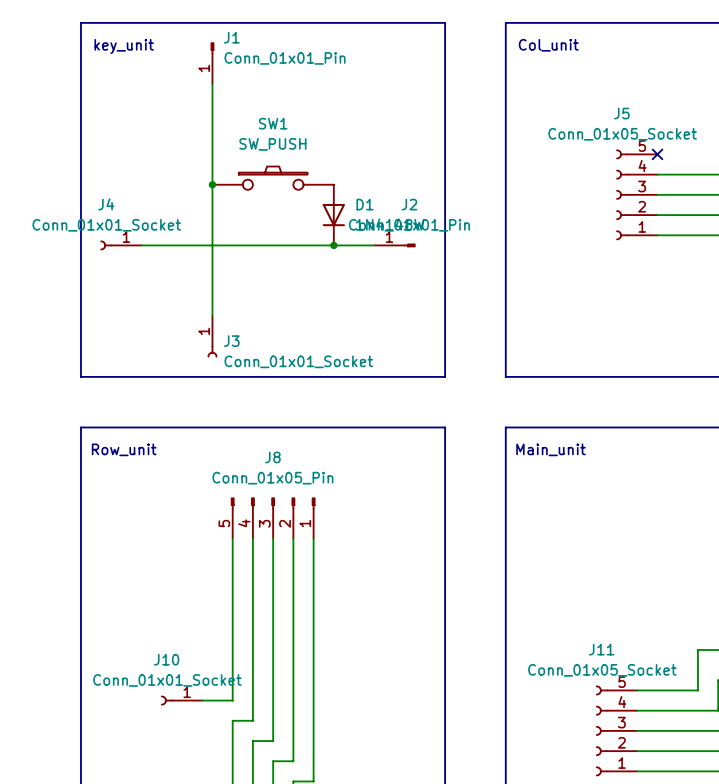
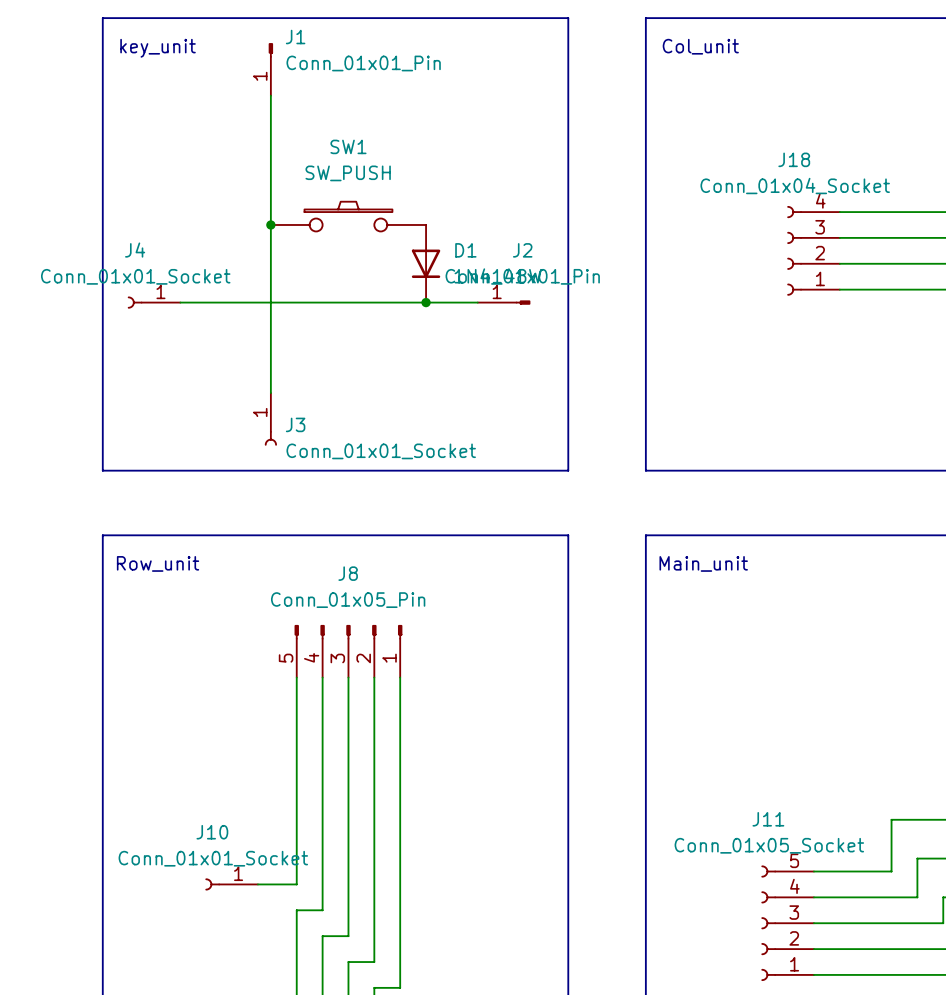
no-connect mark: (657, 154) -> none
J5: Conn_01x05_Socket (636, 194) -> none
J18: none -> Conn_01x04_Socket (813, 250)

